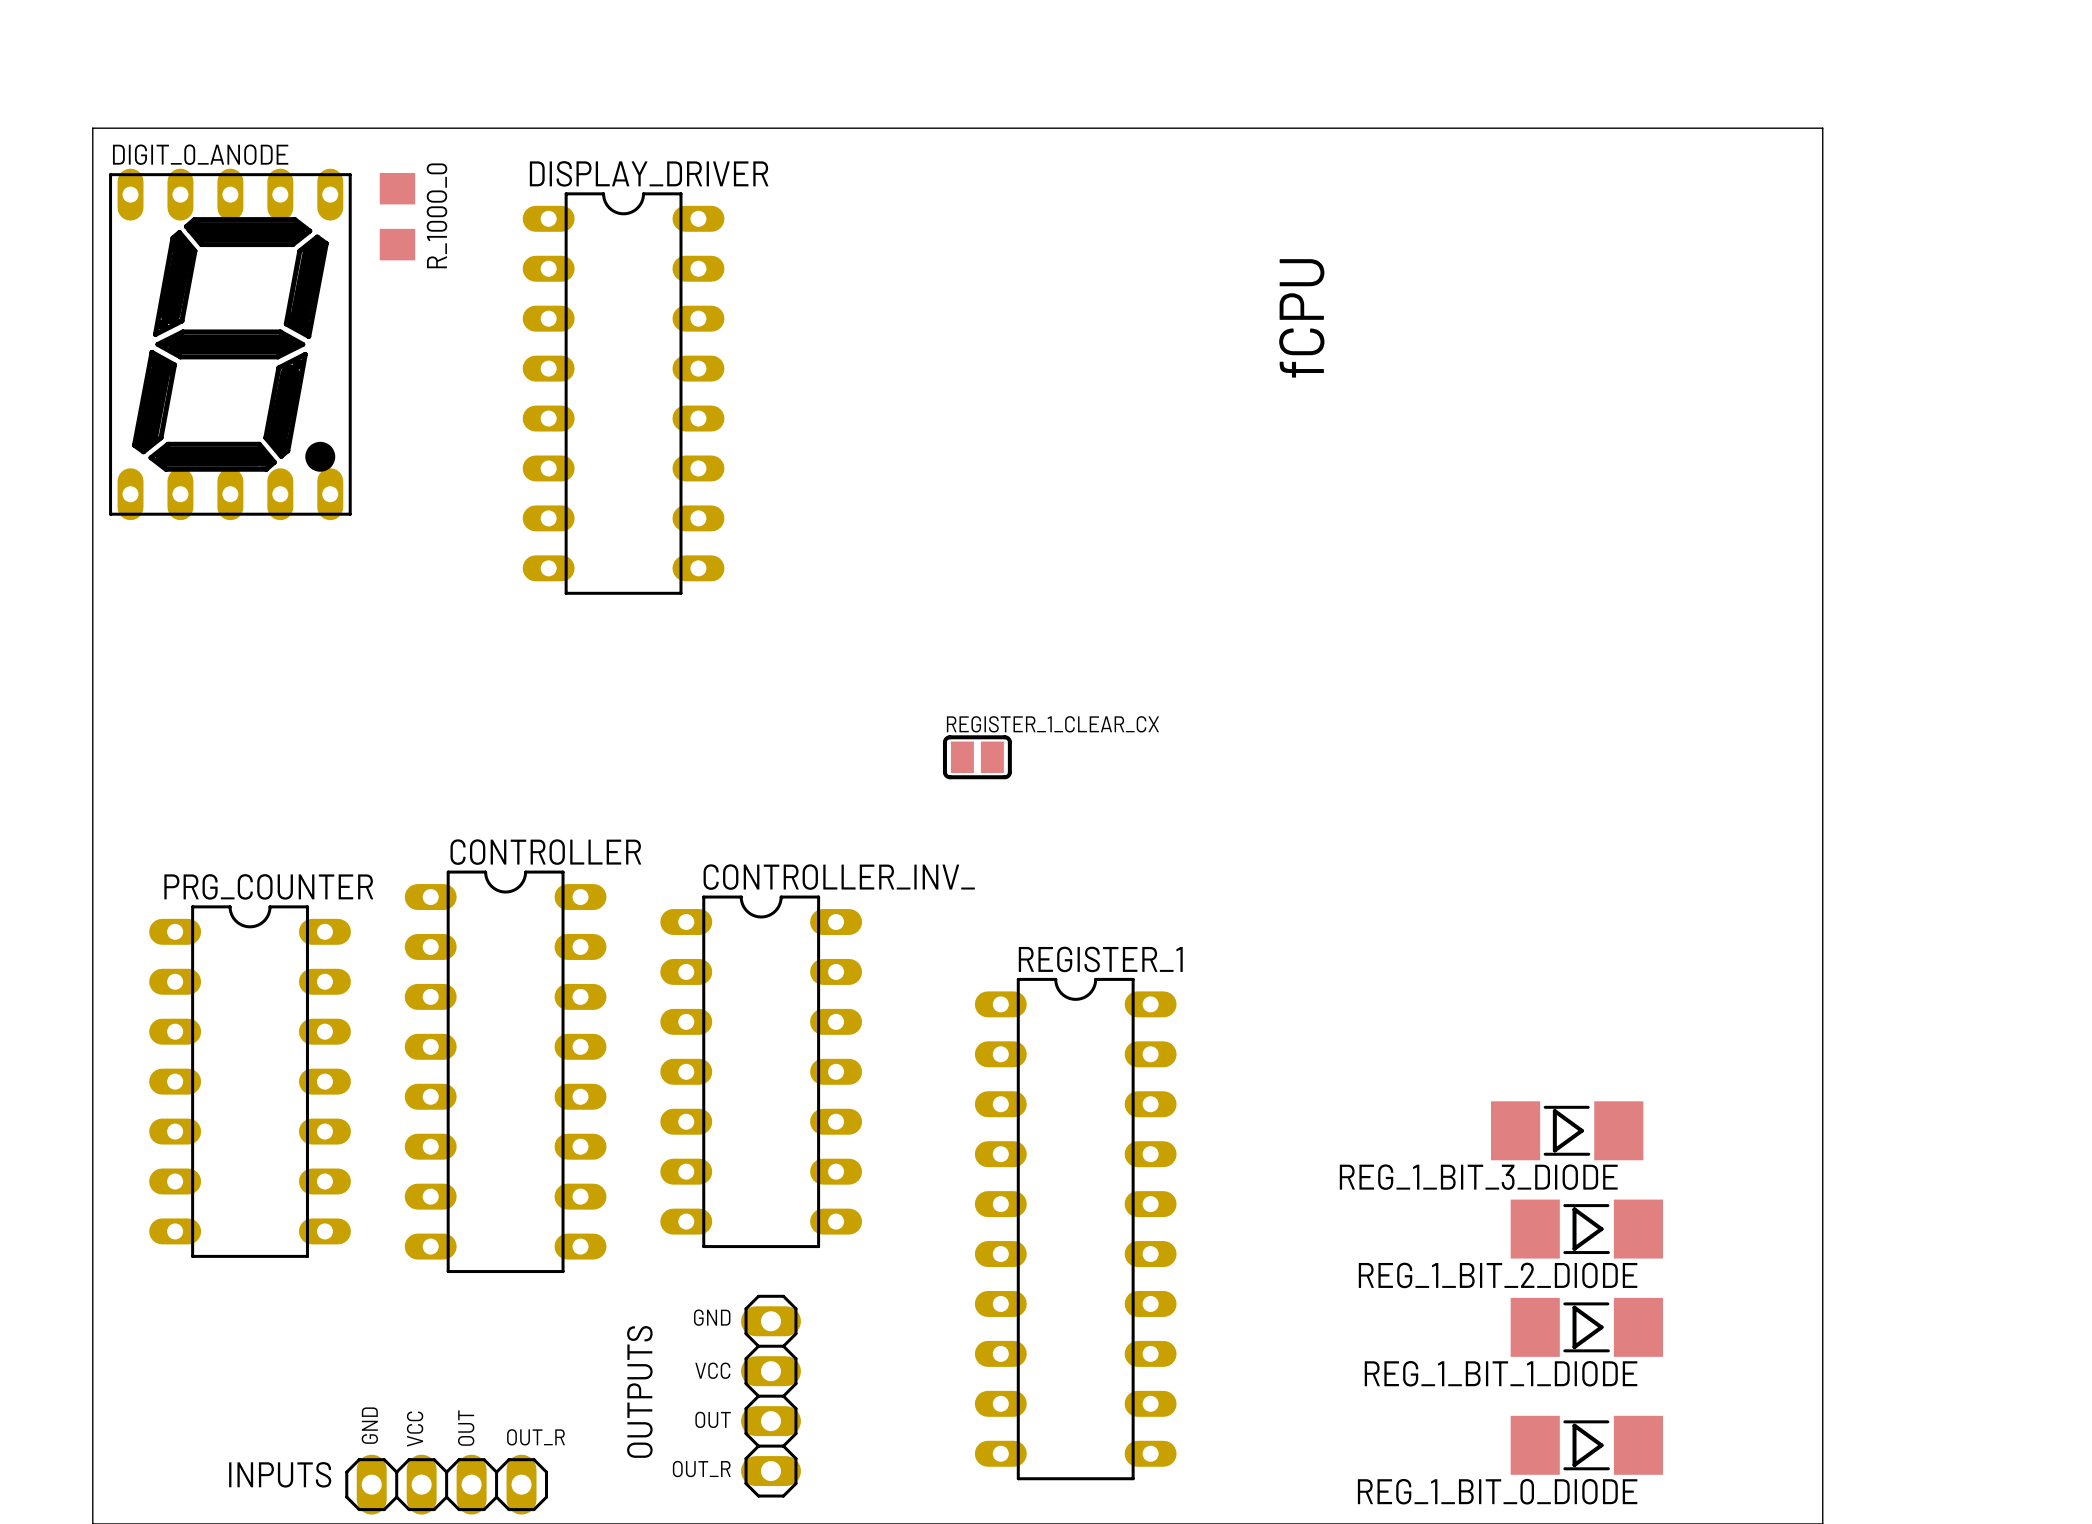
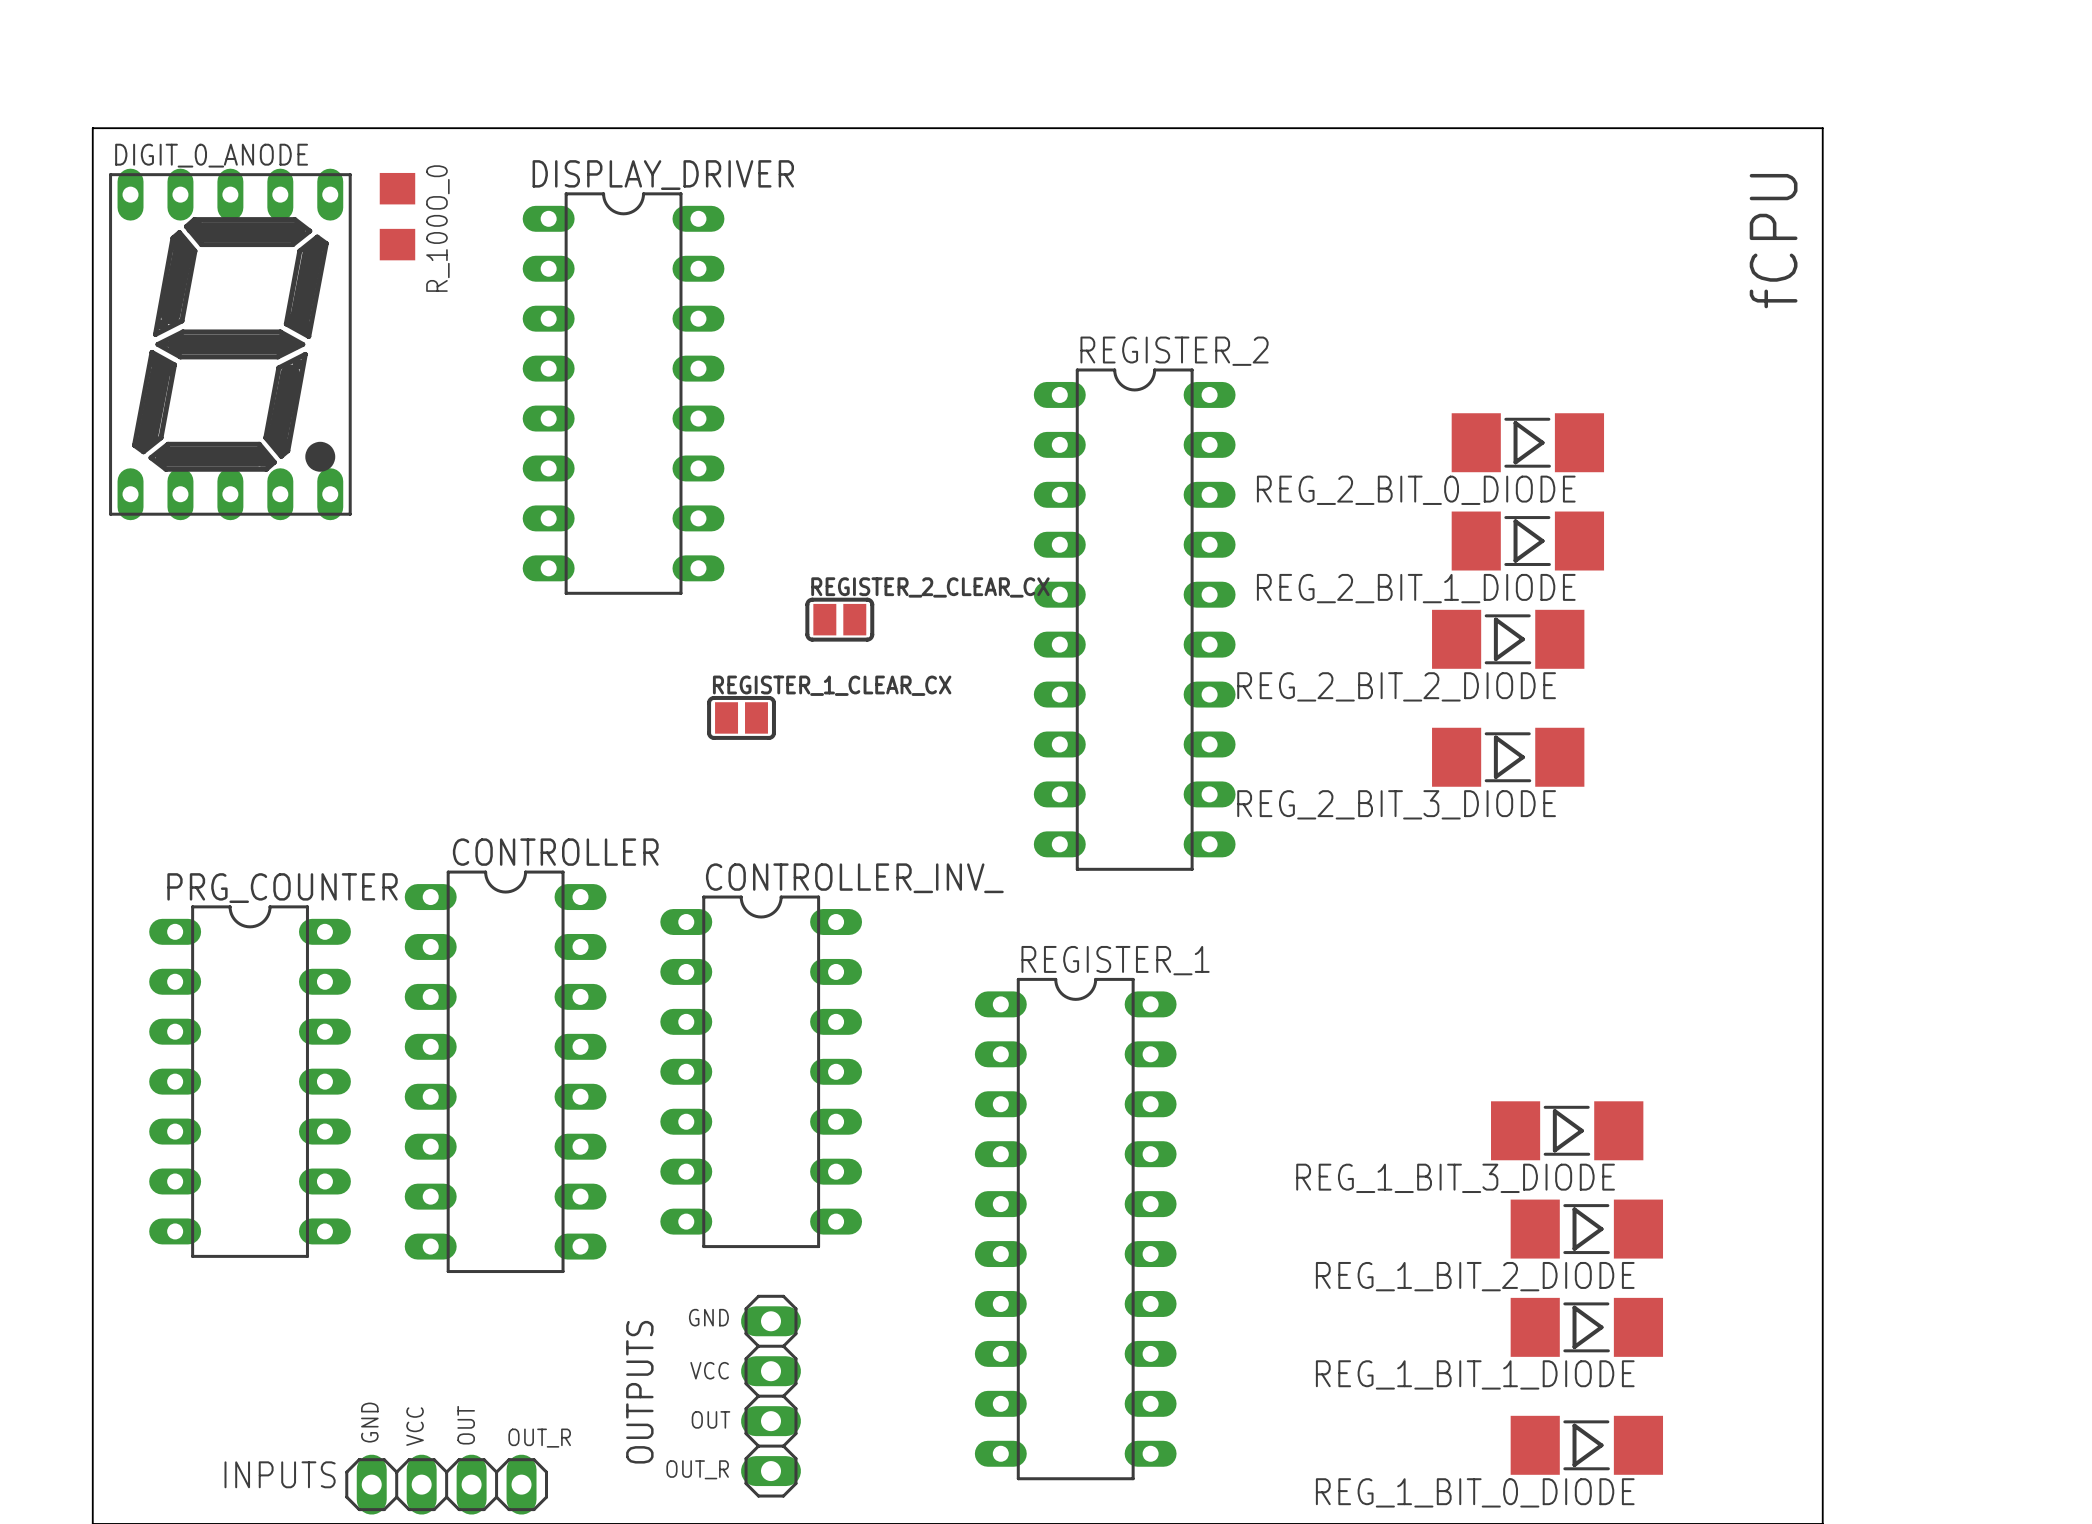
text position: fCPU (1301, 318) -> fCPU (1773, 241)
REG_2_BIT_0_DIODE: none -> (1527, 442)
REG_2_BIT_1_DIODE: none -> (1527, 541)
REGISTER_2_CLEAR_CX: none -> (839, 619)
REGISTER_2: none -> (1134, 619)
REG_2_BIT_2_DIODE: none -> (1508, 639)
REGISTER_1_CLEAR_CX position: (977, 757) -> (741, 717)
REG_2_BIT_3_DIODE: none -> (1508, 757)

